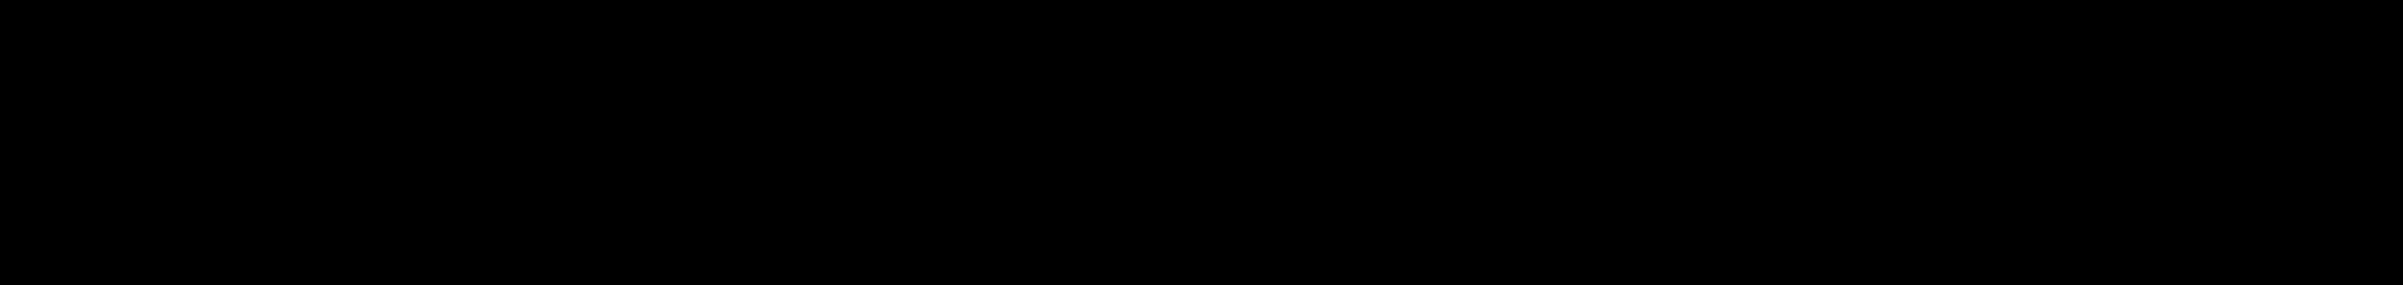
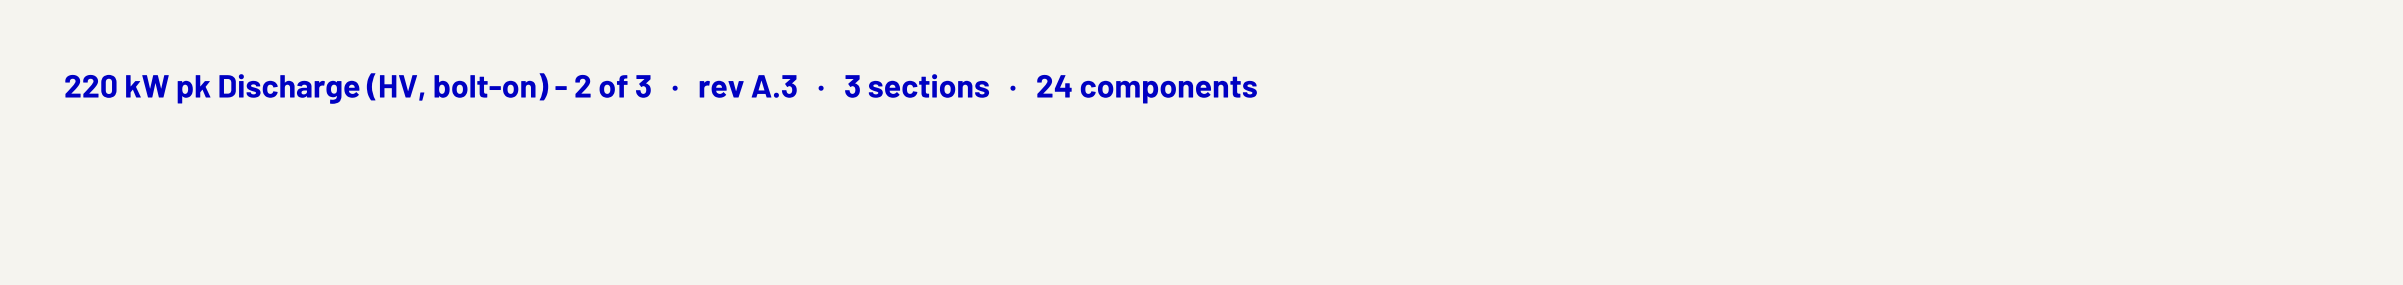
text: none -> 220 kW pk Discharge (HV, bolt-on) - 2 of 3 · rev A.3 · 3 sections · 24 components (661, 88)

